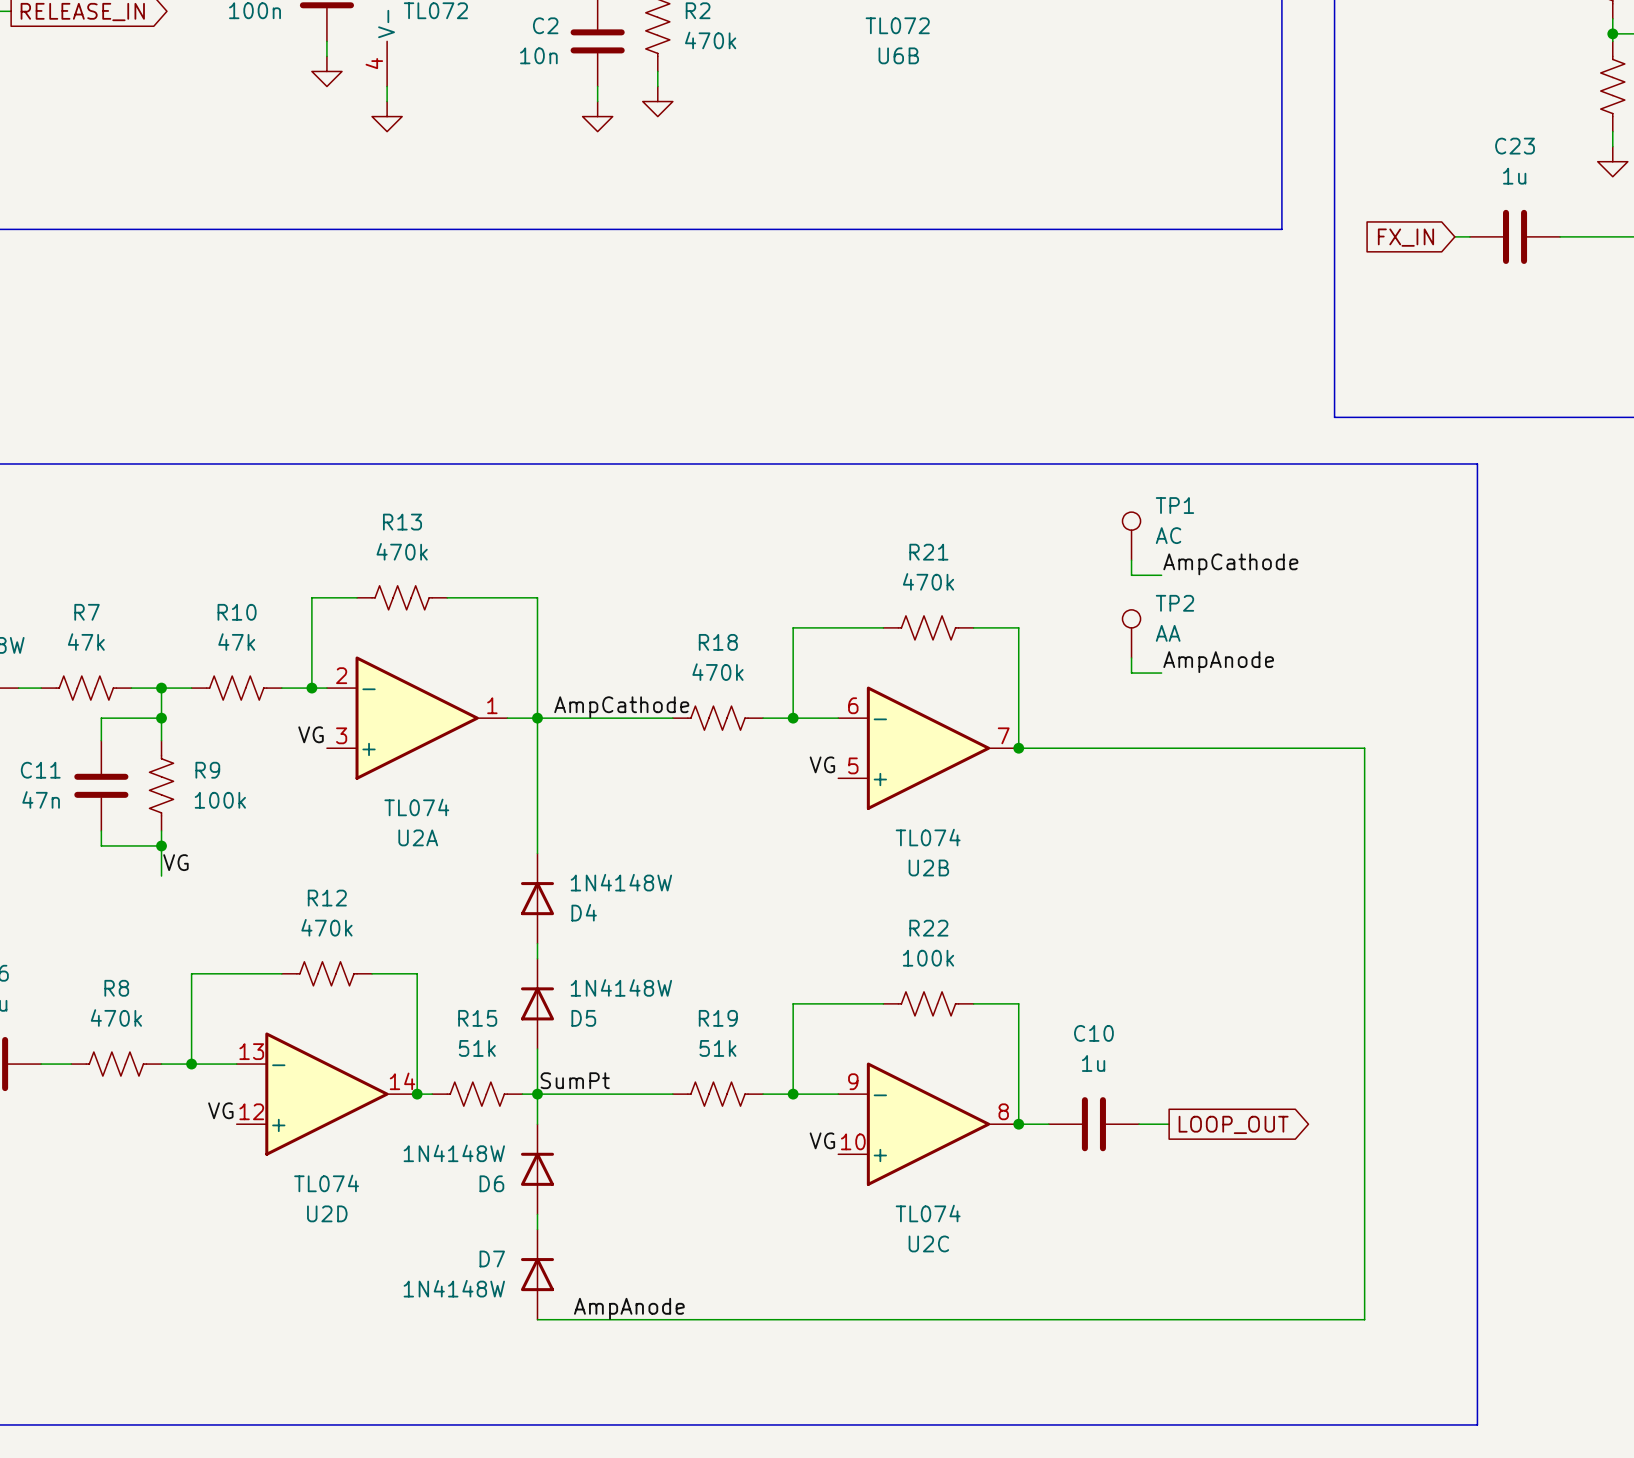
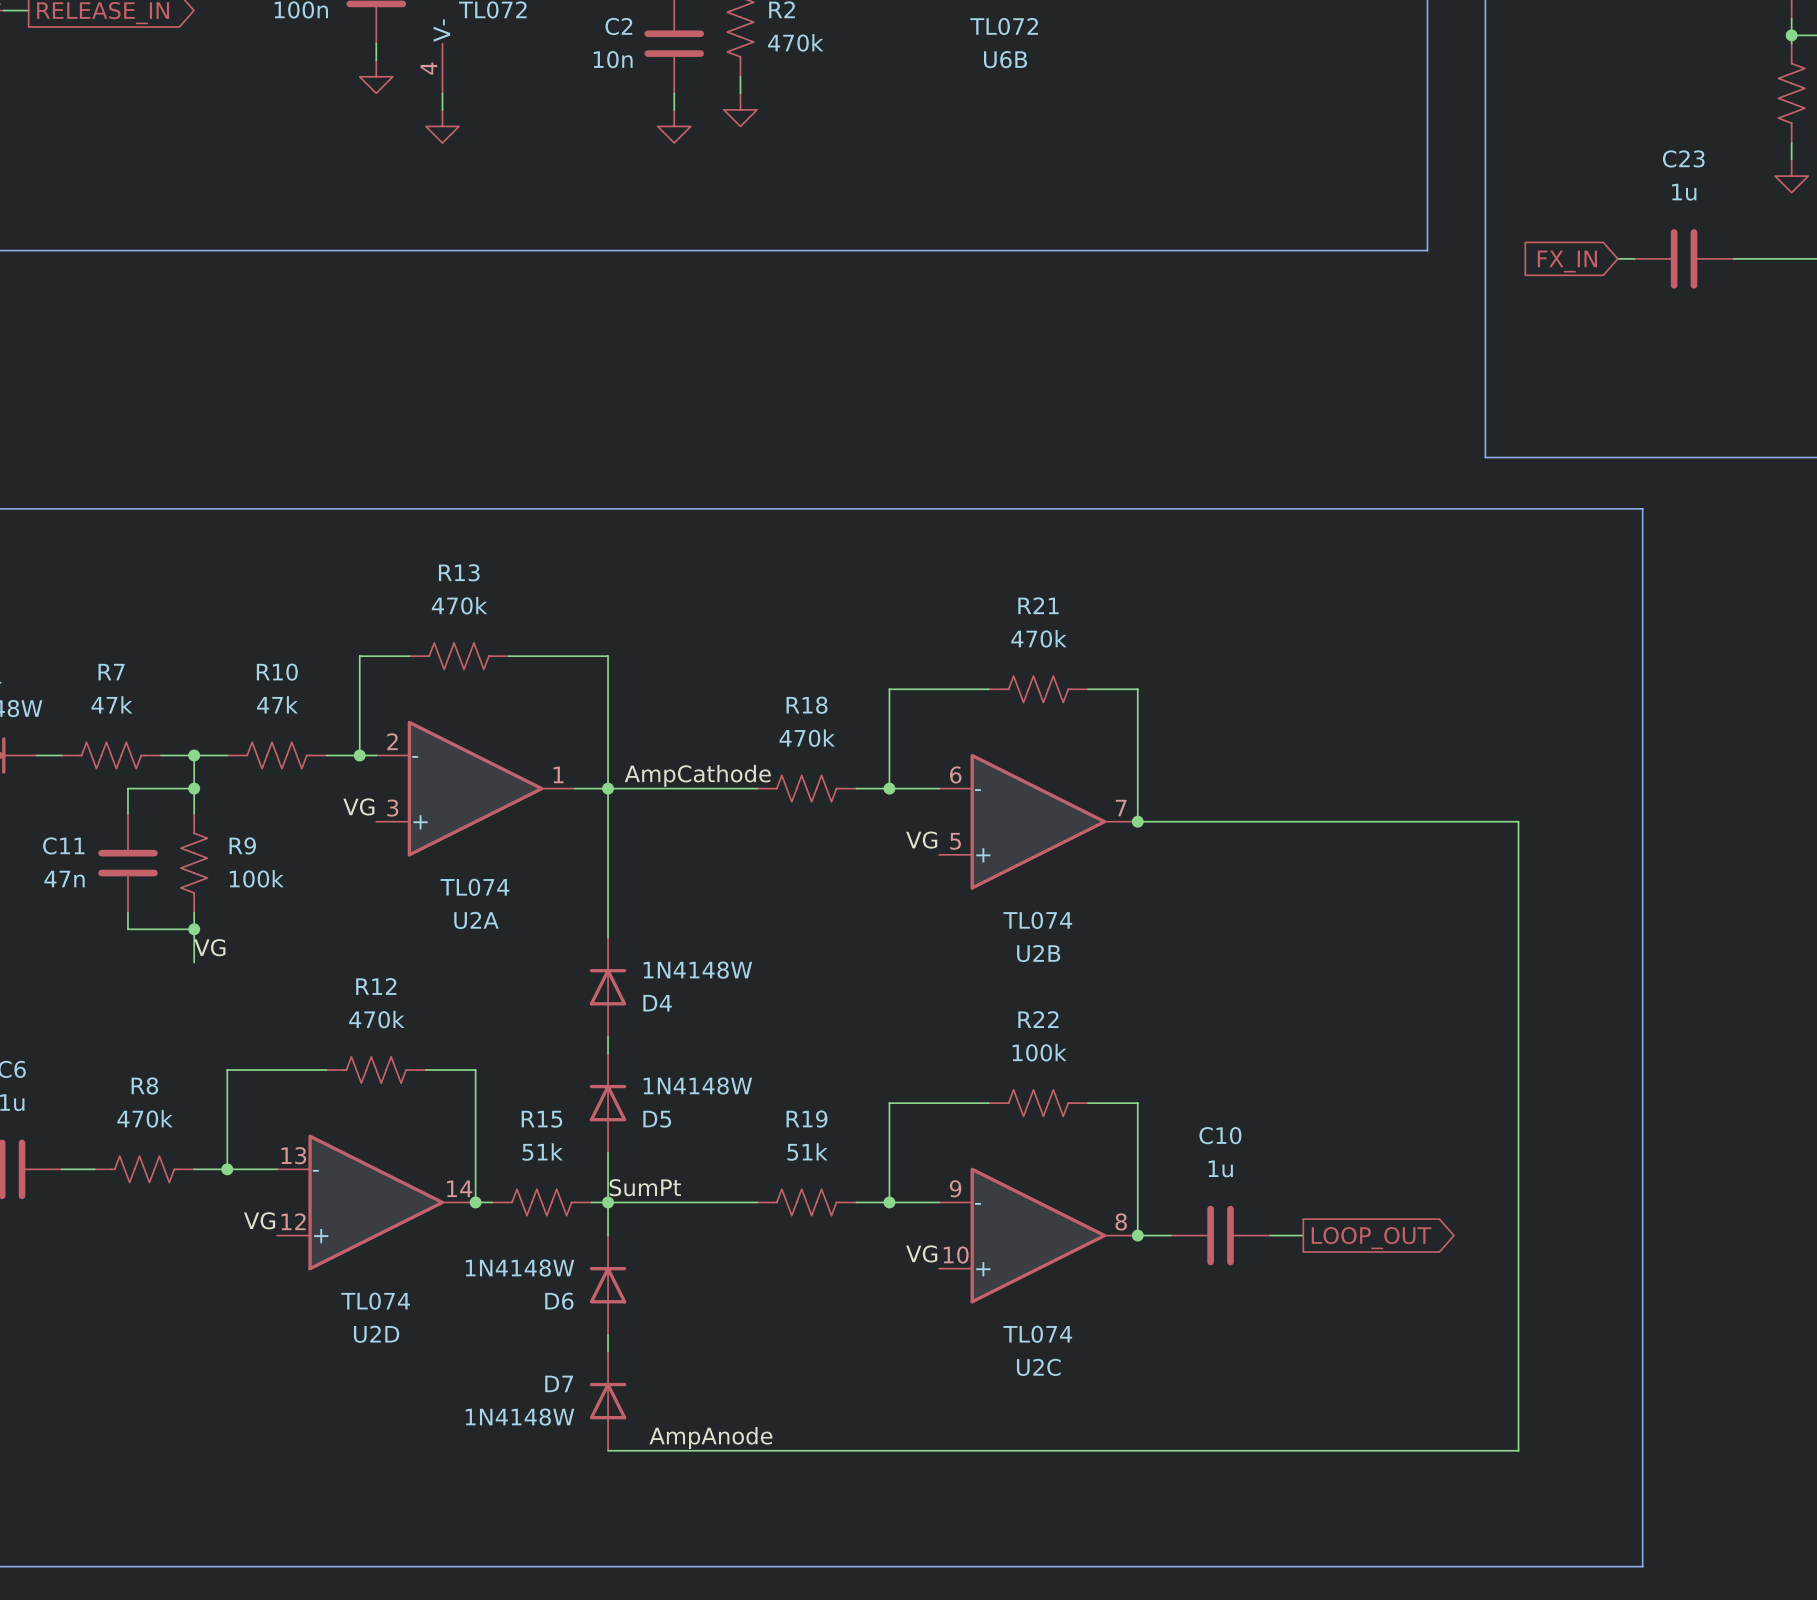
TP1: AC (1131, 536) -> none
wire: (1131, 560) (1131, 575) (1161, 575) -> none
label: AmpCathode (1230, 564) -> none
TP2: AA (1131, 633) -> none
wire: (1131, 657) (1131, 673) (1161, 673) -> none
label: AmpAnode (1218, 662) -> none

